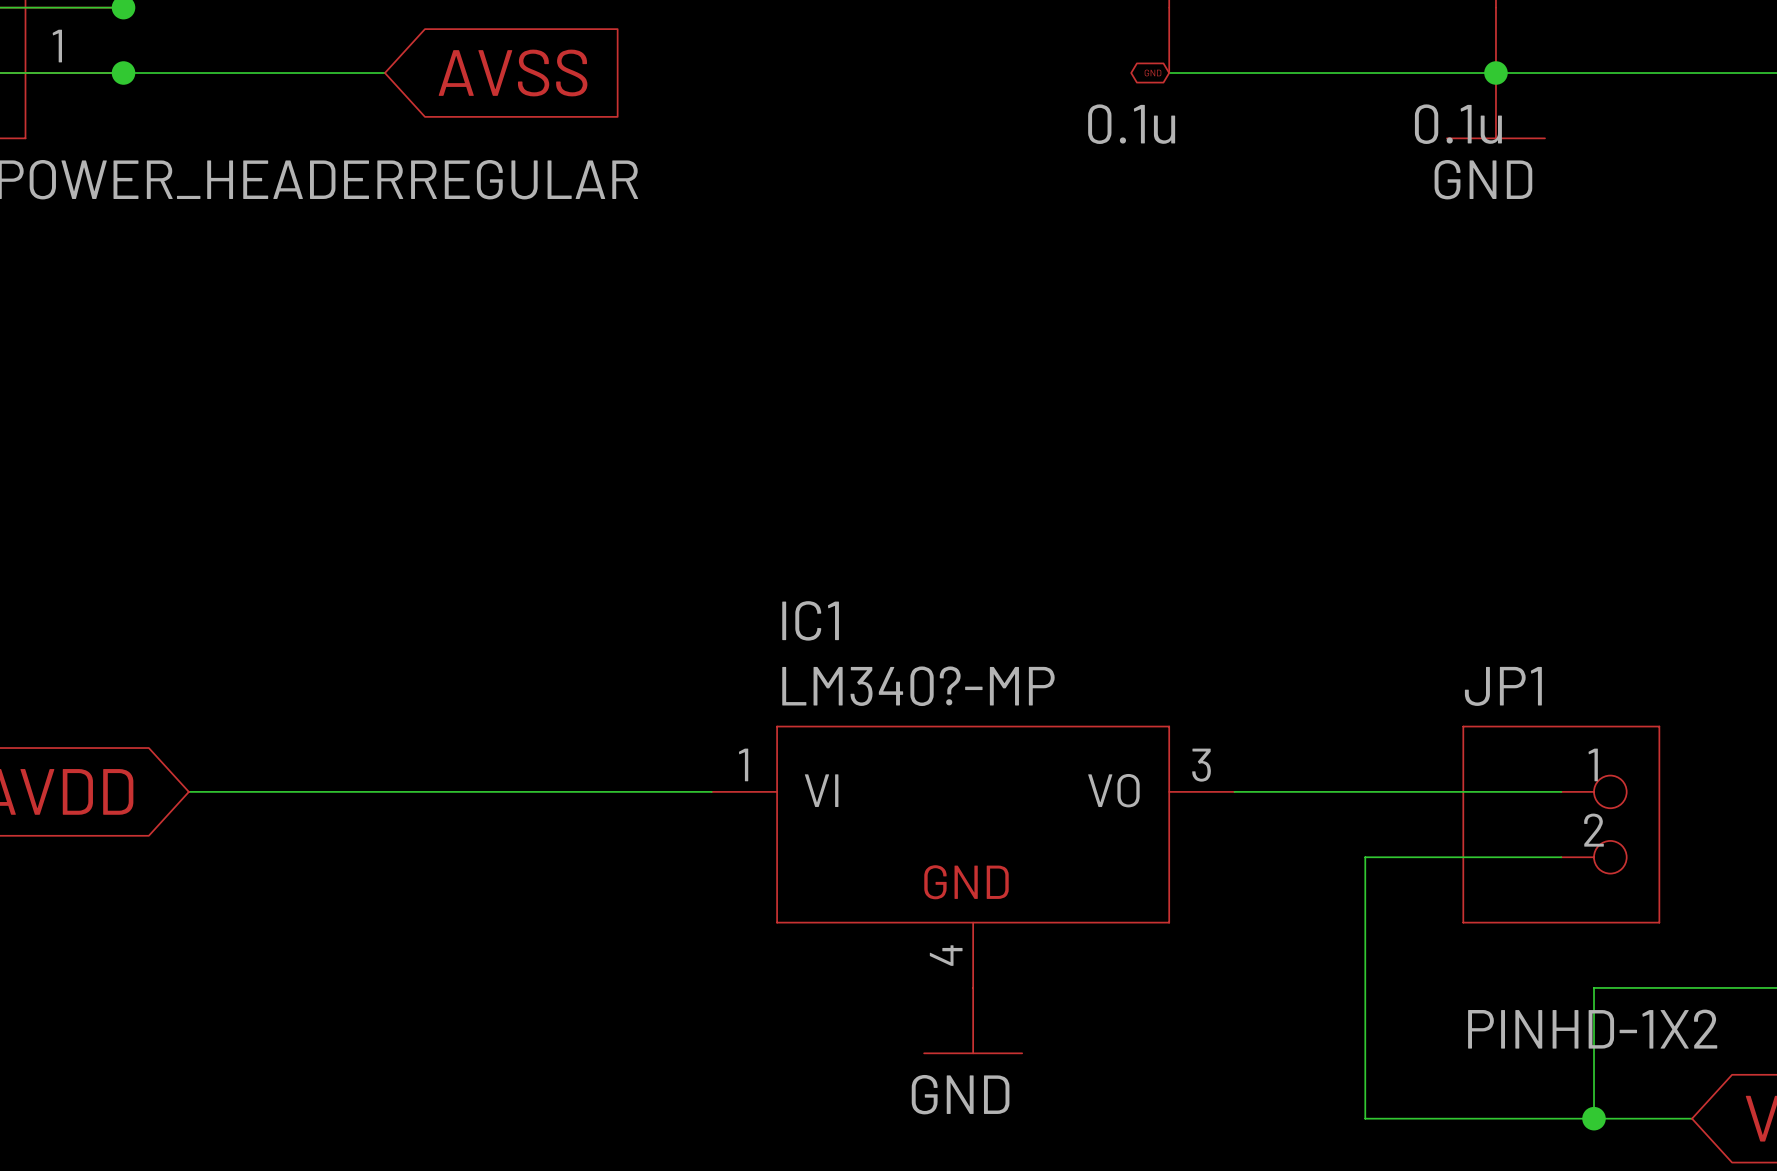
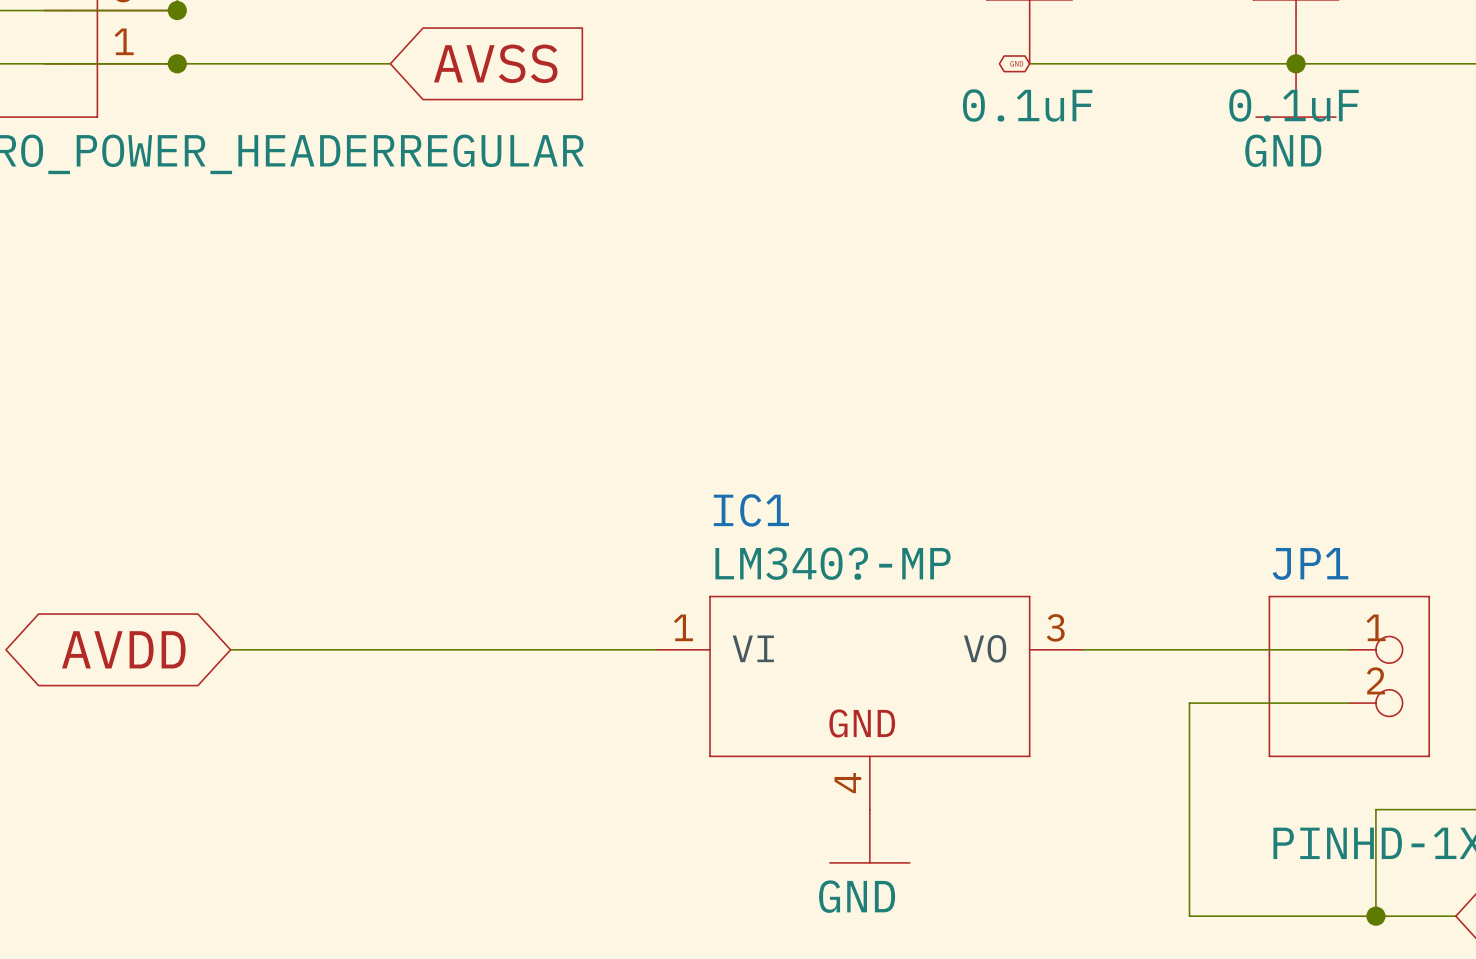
part value: 0.1u (1131, 124) -> 0.1uF (1027, 105)
part value: 0.1u (1458, 124) -> 0.1uF (1294, 105)

